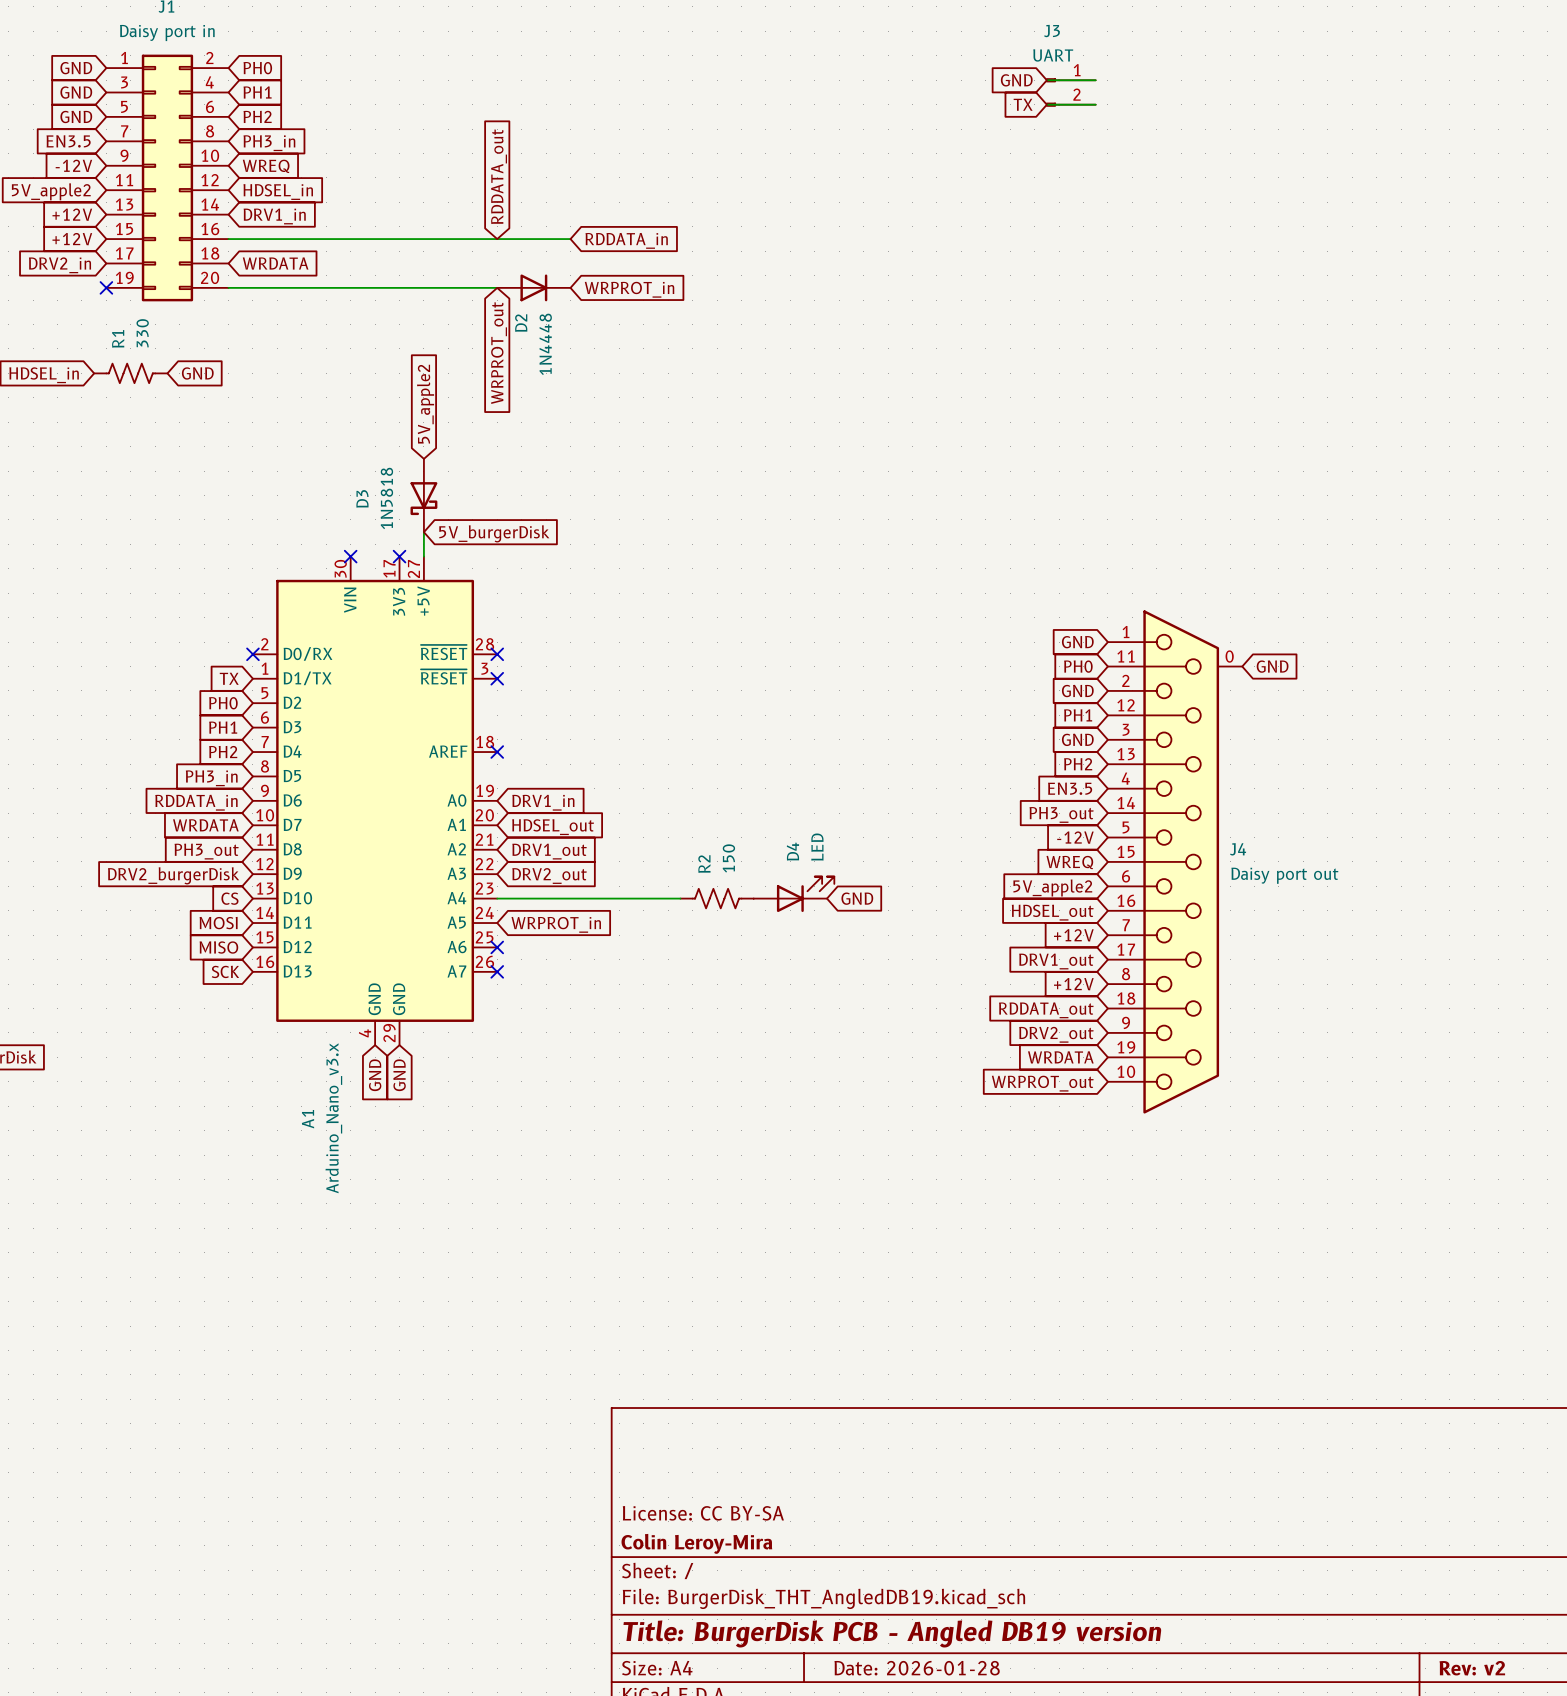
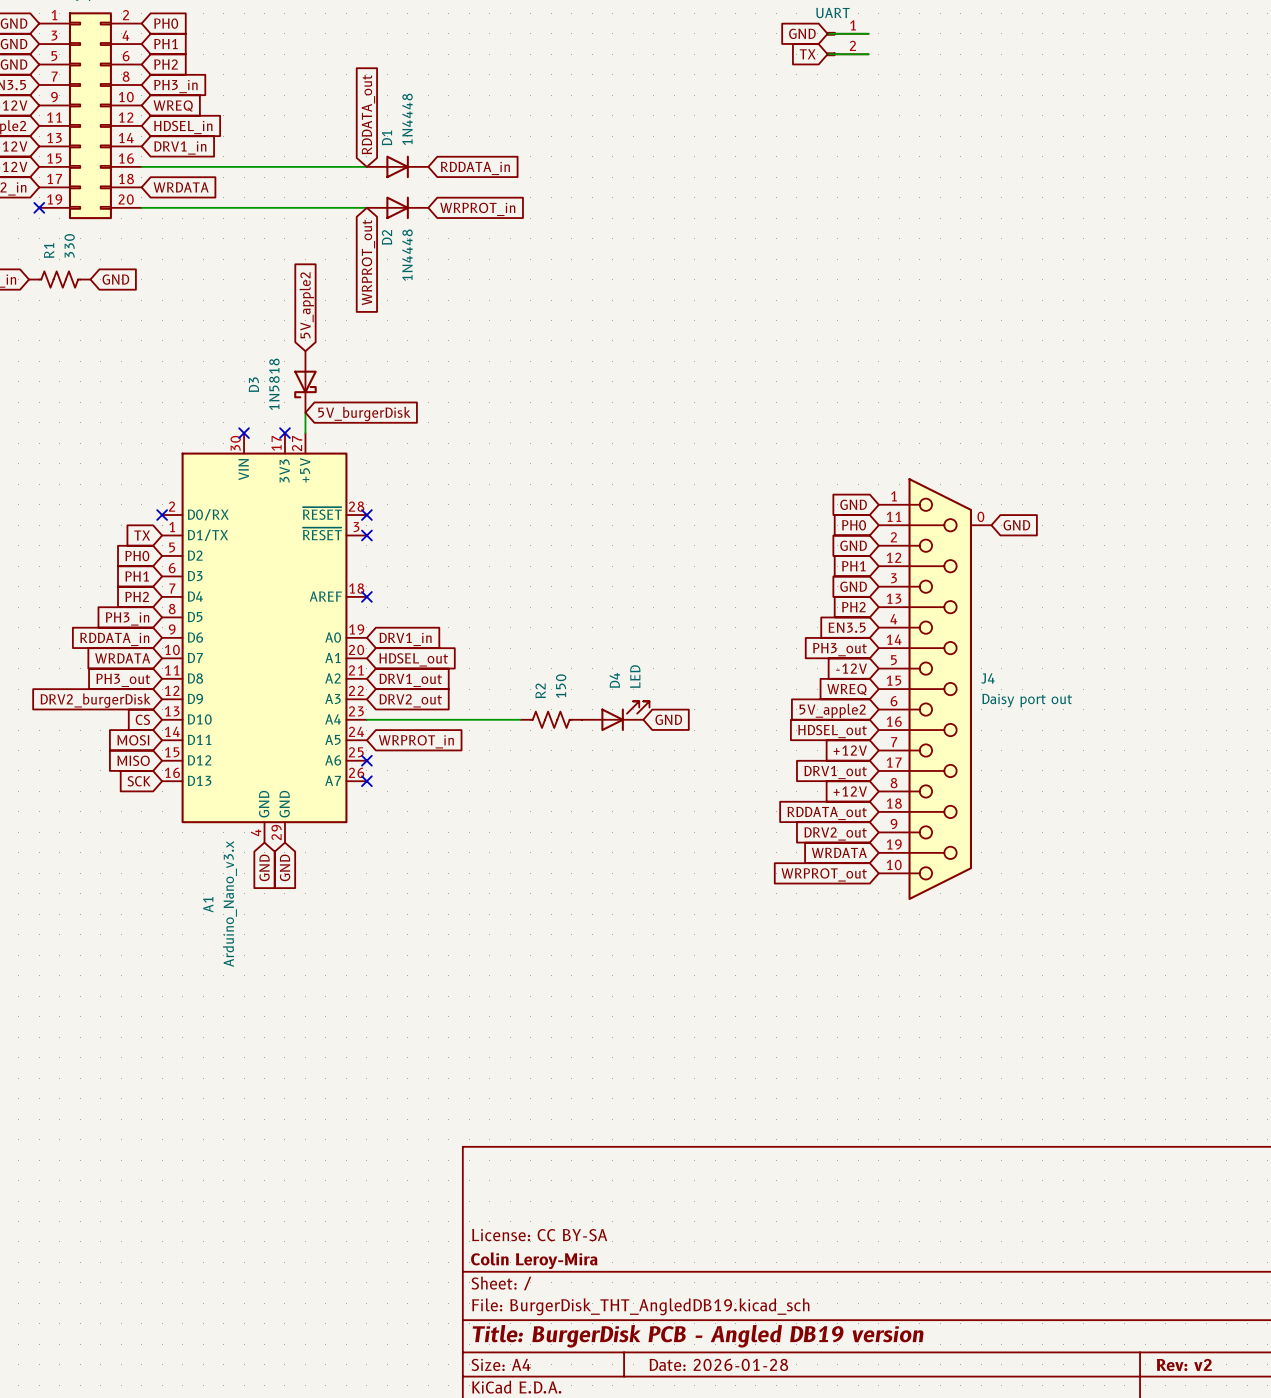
D1: none -> 1N4448 (397, 166)

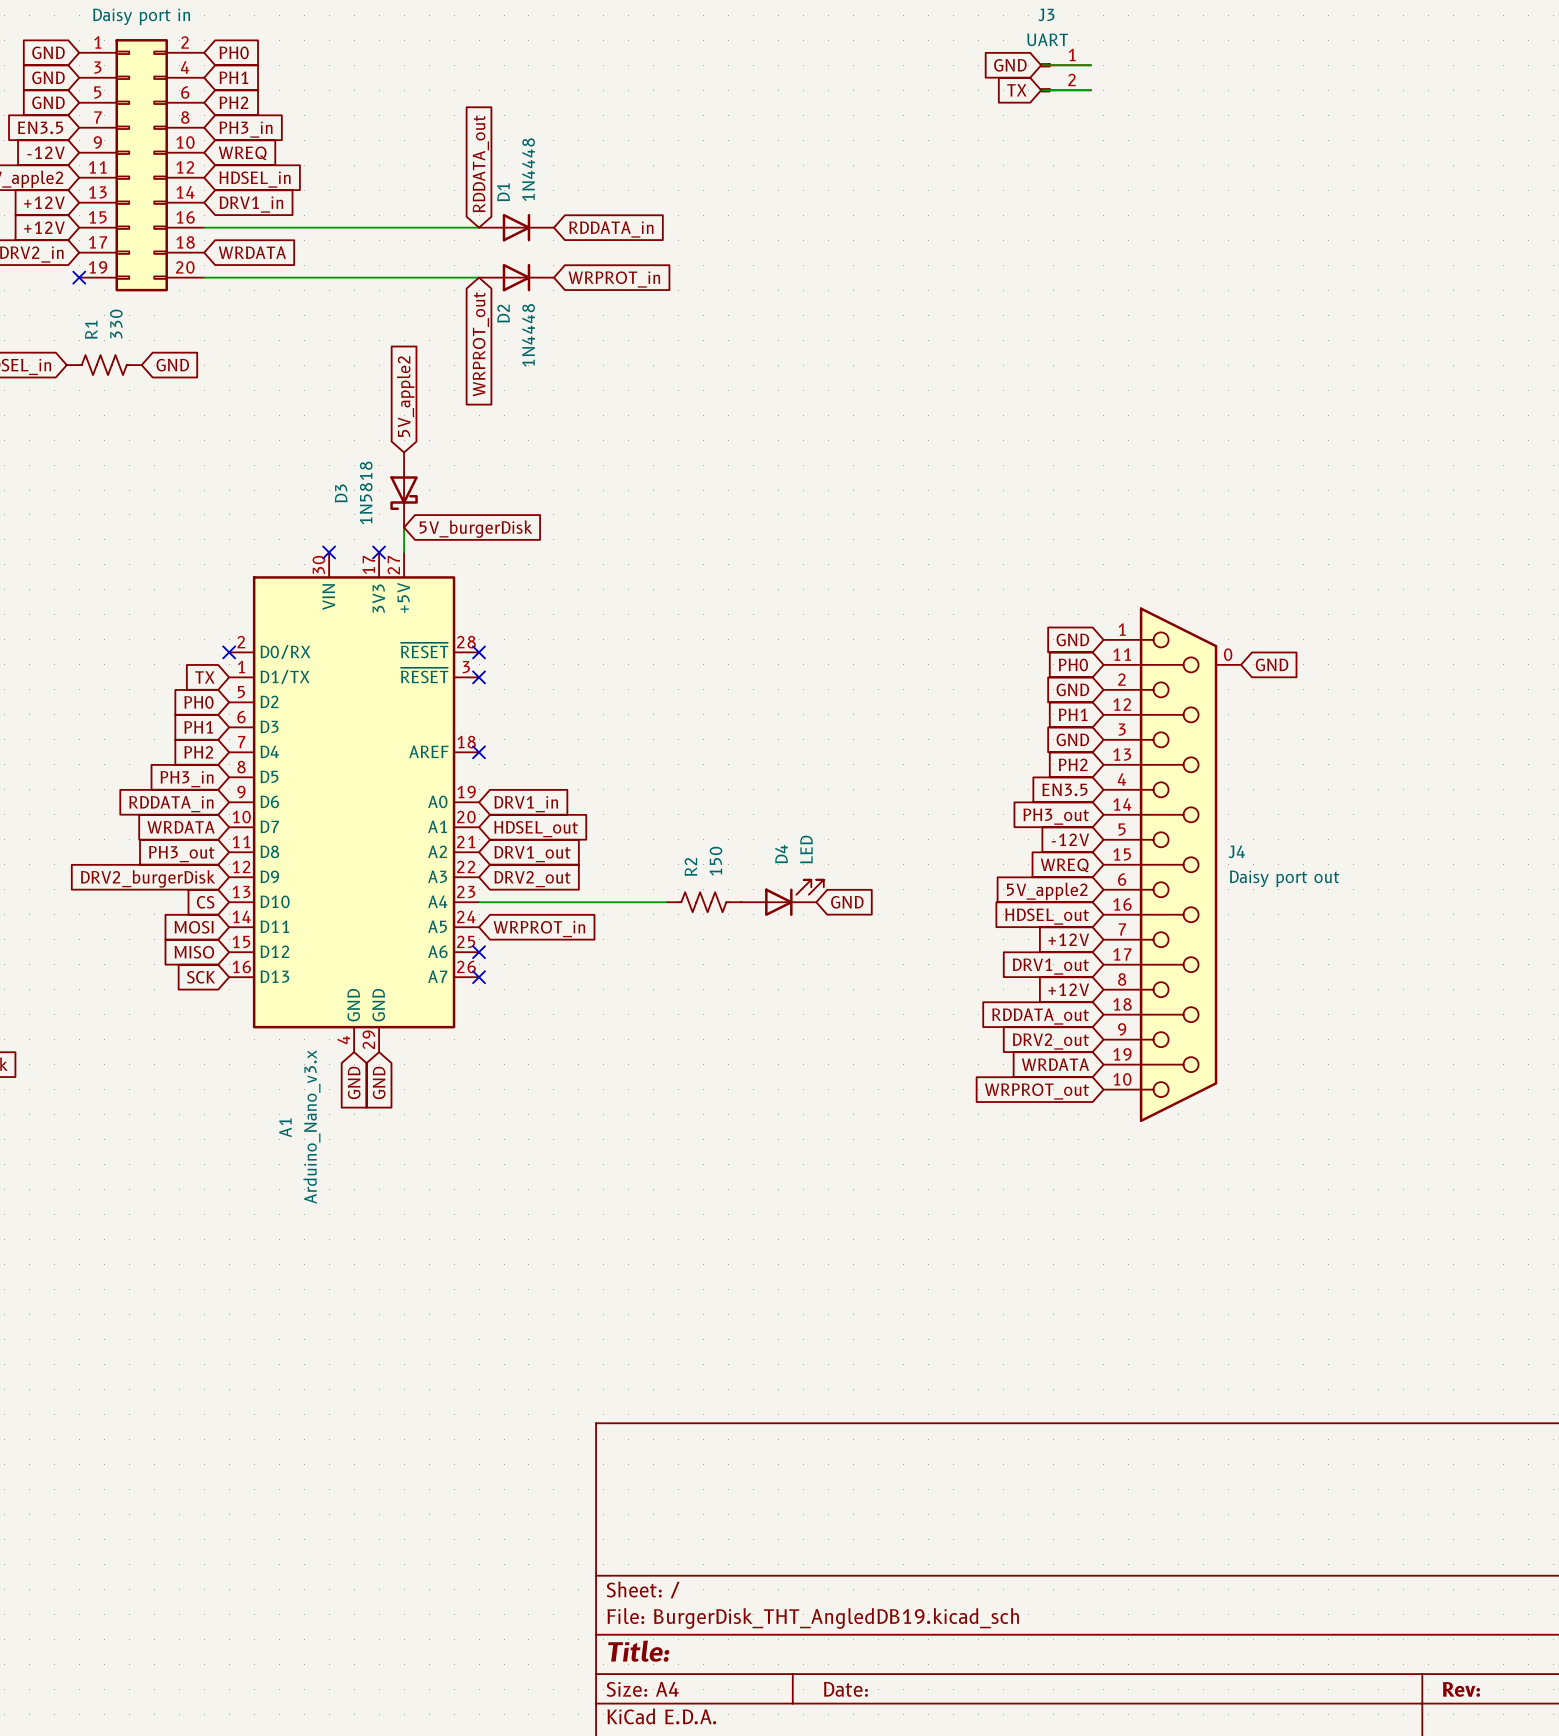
title block: License: CC BY-SA (539, 1235) -> none
title block: Colin Leroy-Mira (534, 1260) -> none
title block: Title: BurgerDisk PCB - Angled DB19 version (698, 1336) -> Title: (638, 1651)
title block: Date: 2026-01-28 (718, 1364) -> Date: (845, 1689)
title block: Rev: v2 (1184, 1364) -> Rev: (1461, 1689)

